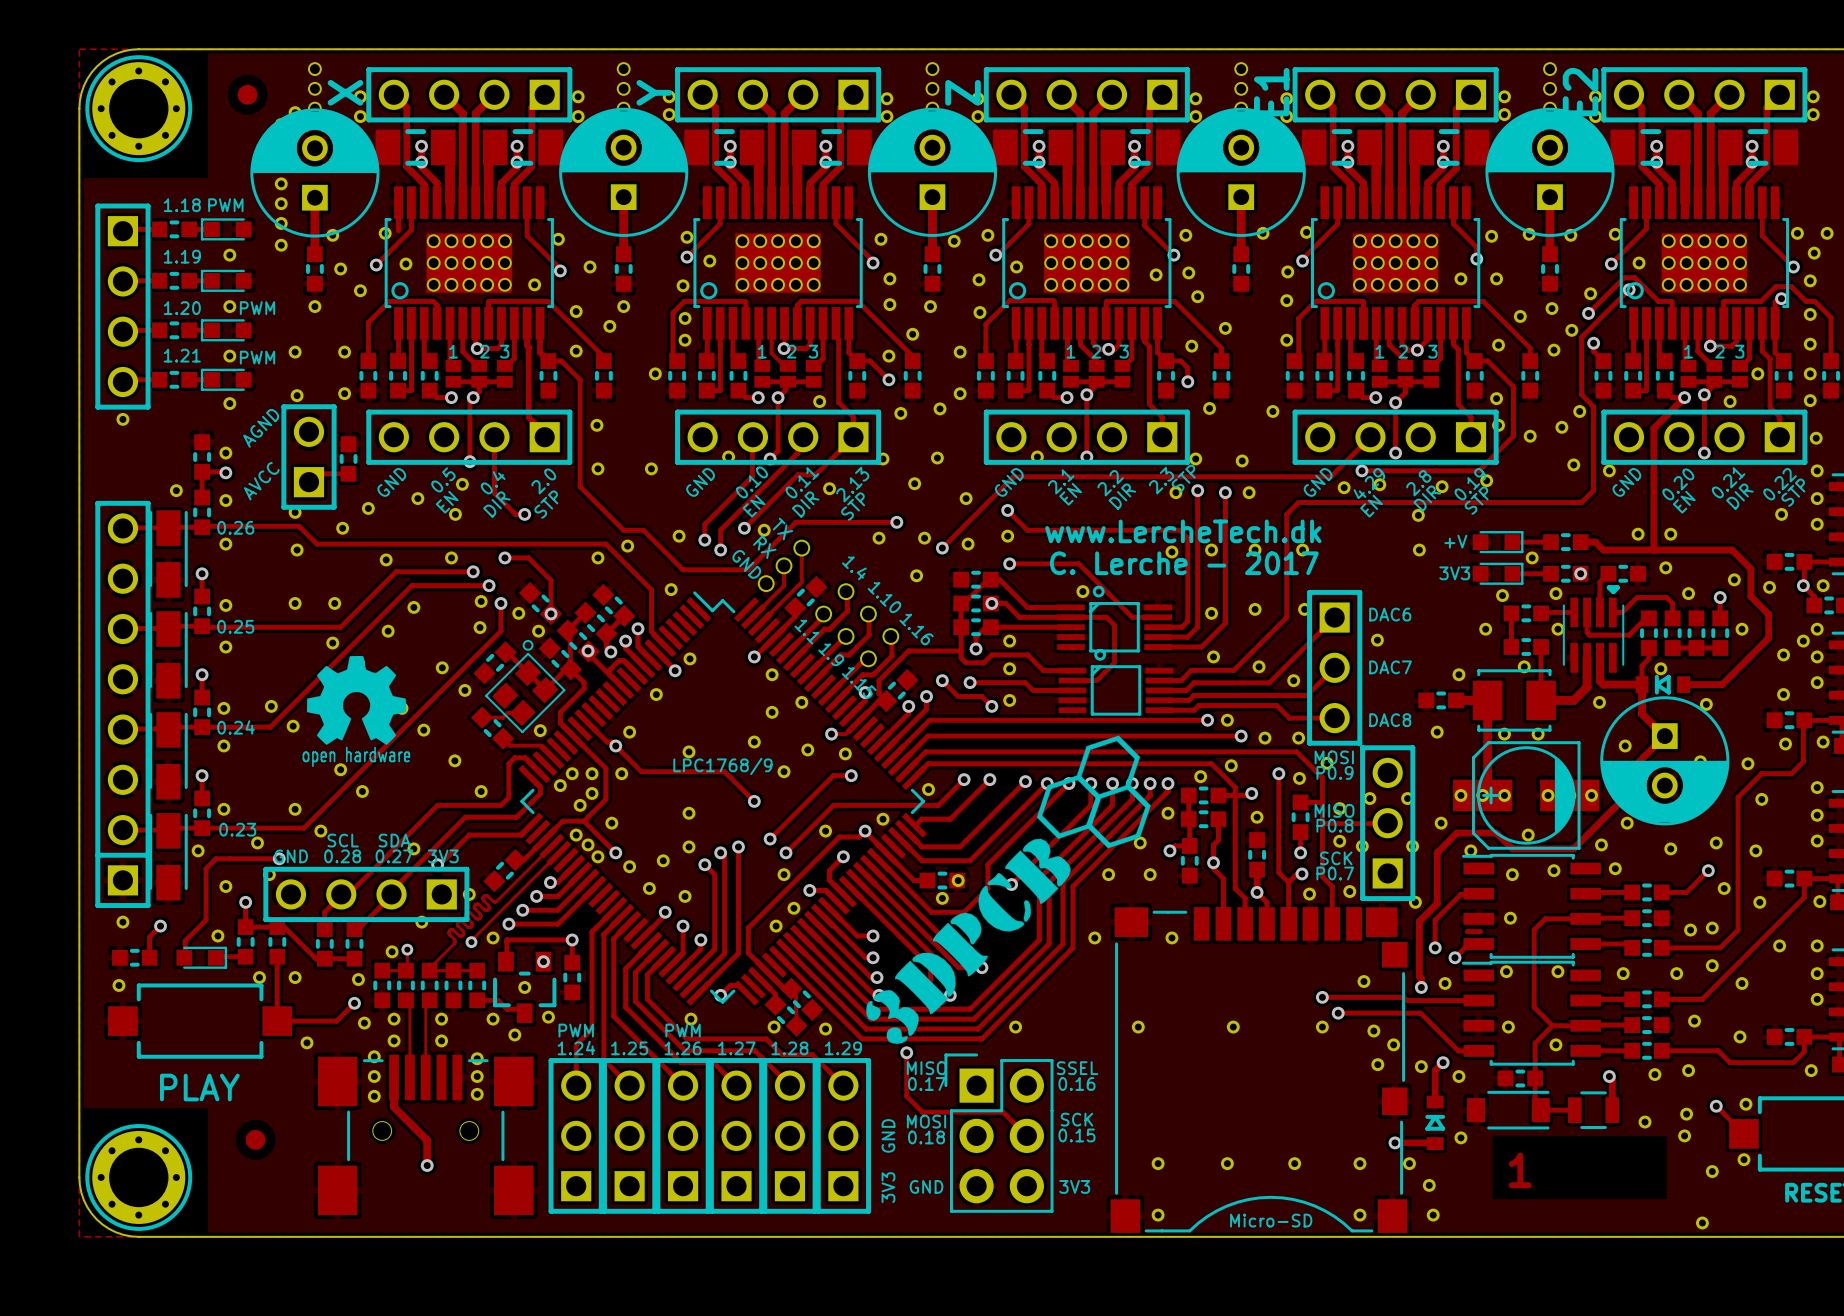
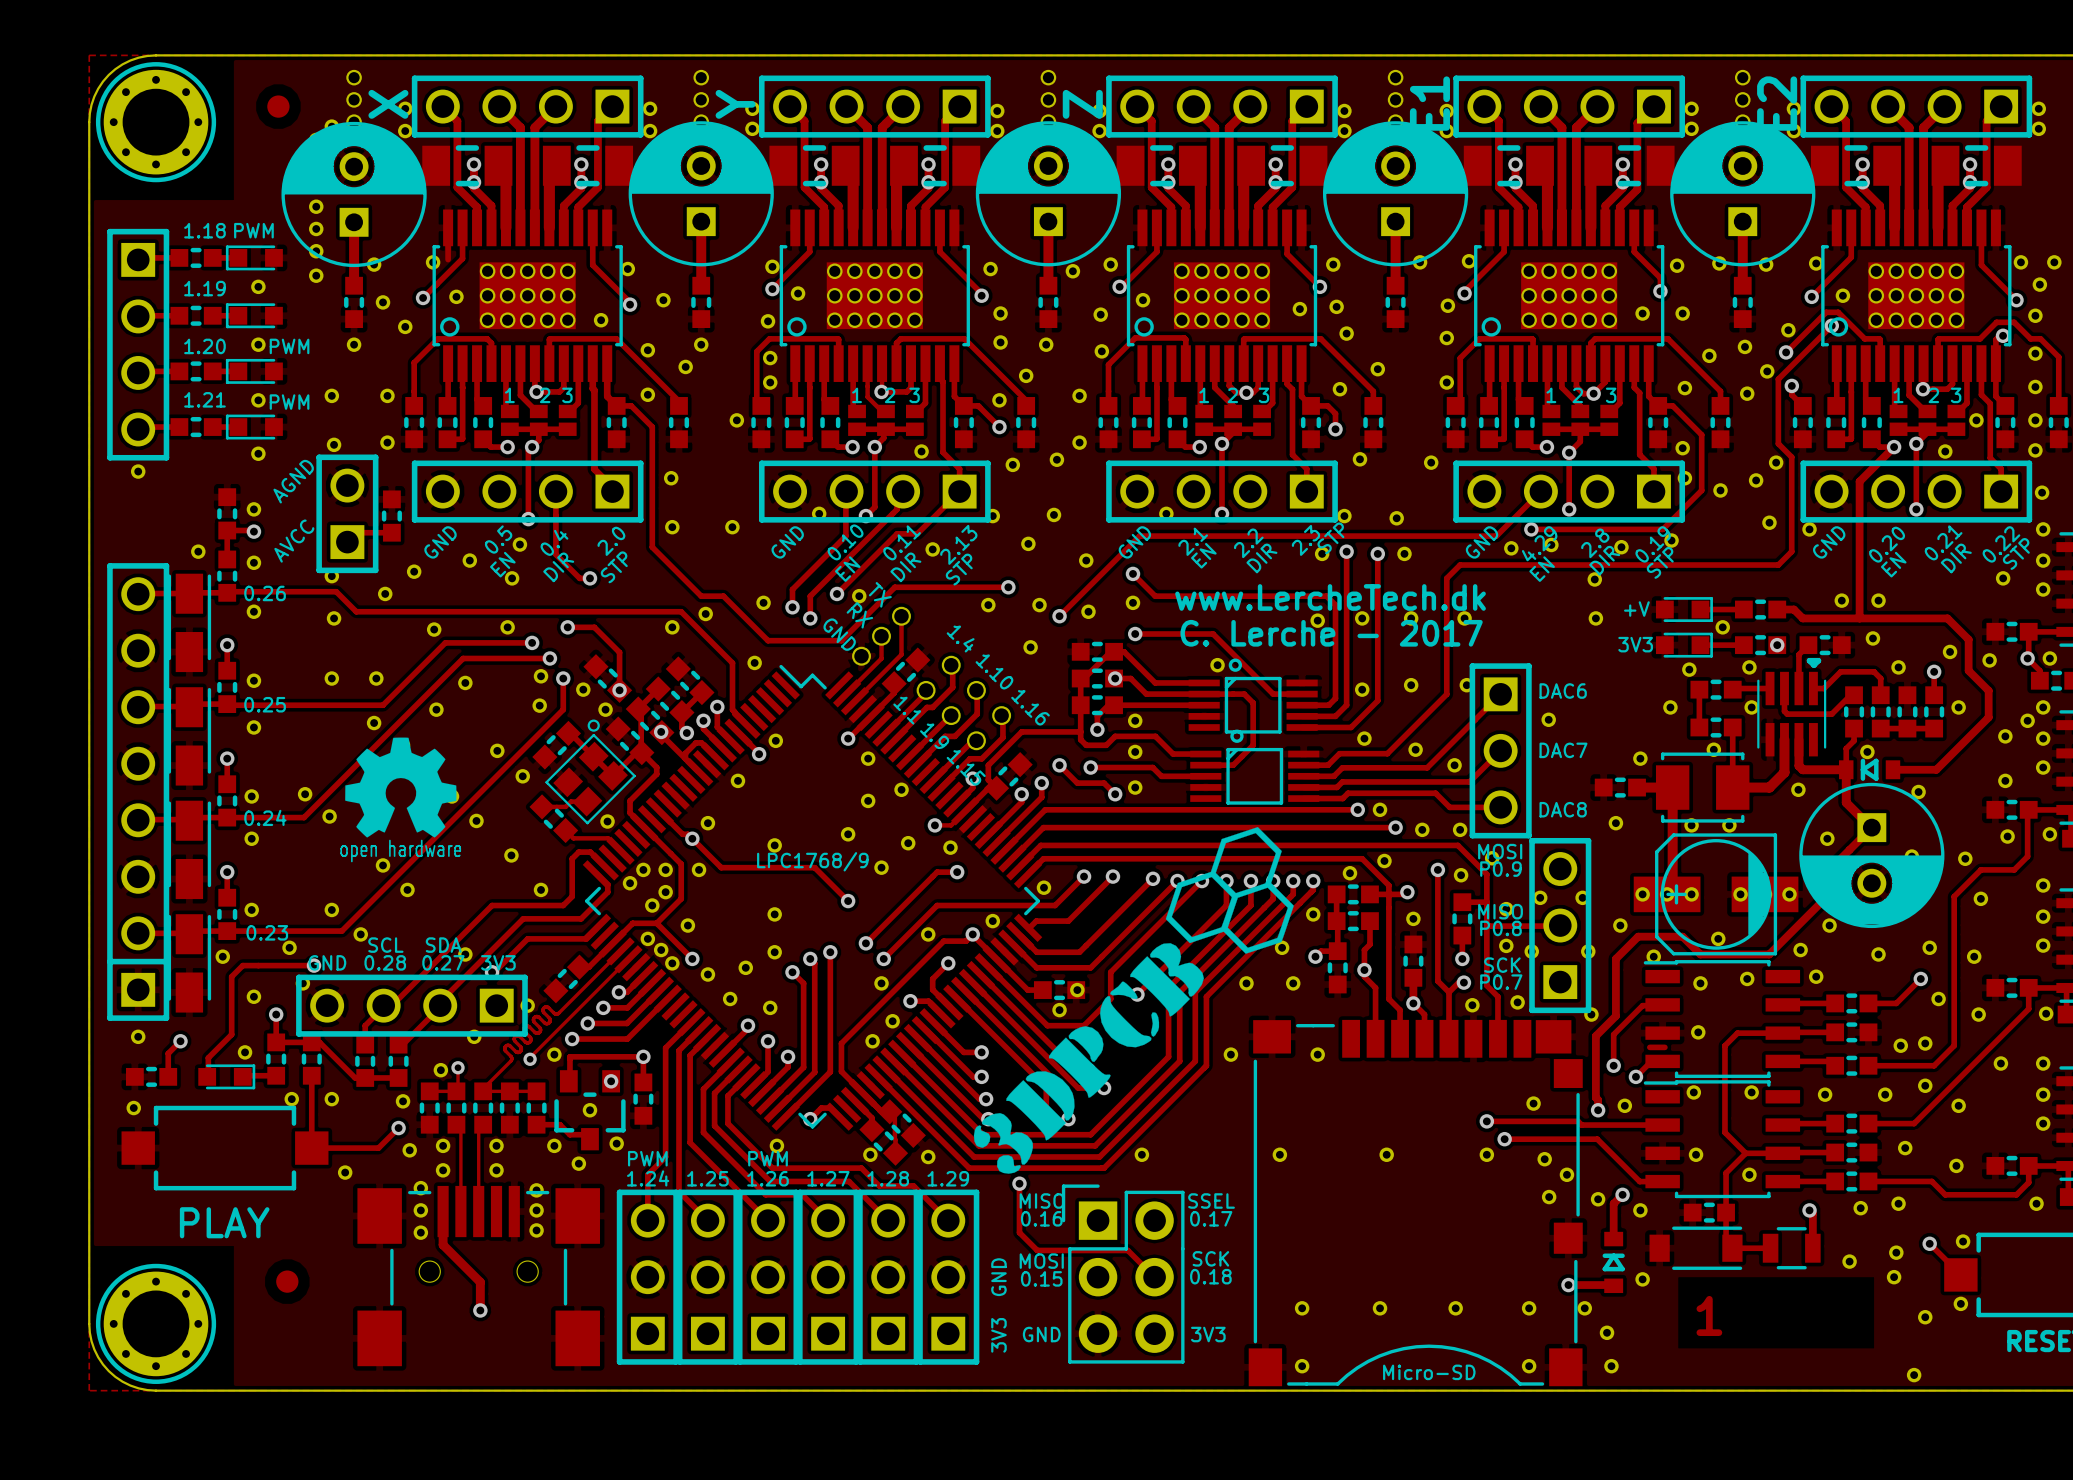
text: 0.17 (926, 1084) -> 0.16 (1041, 1218)
text: 0.16 (1076, 1084) -> 0.17 (1211, 1218)
text: 0.15 (1076, 1135) -> 0.18 (1210, 1276)
text: 0.18 (926, 1137) -> 0.15 (1041, 1278)

